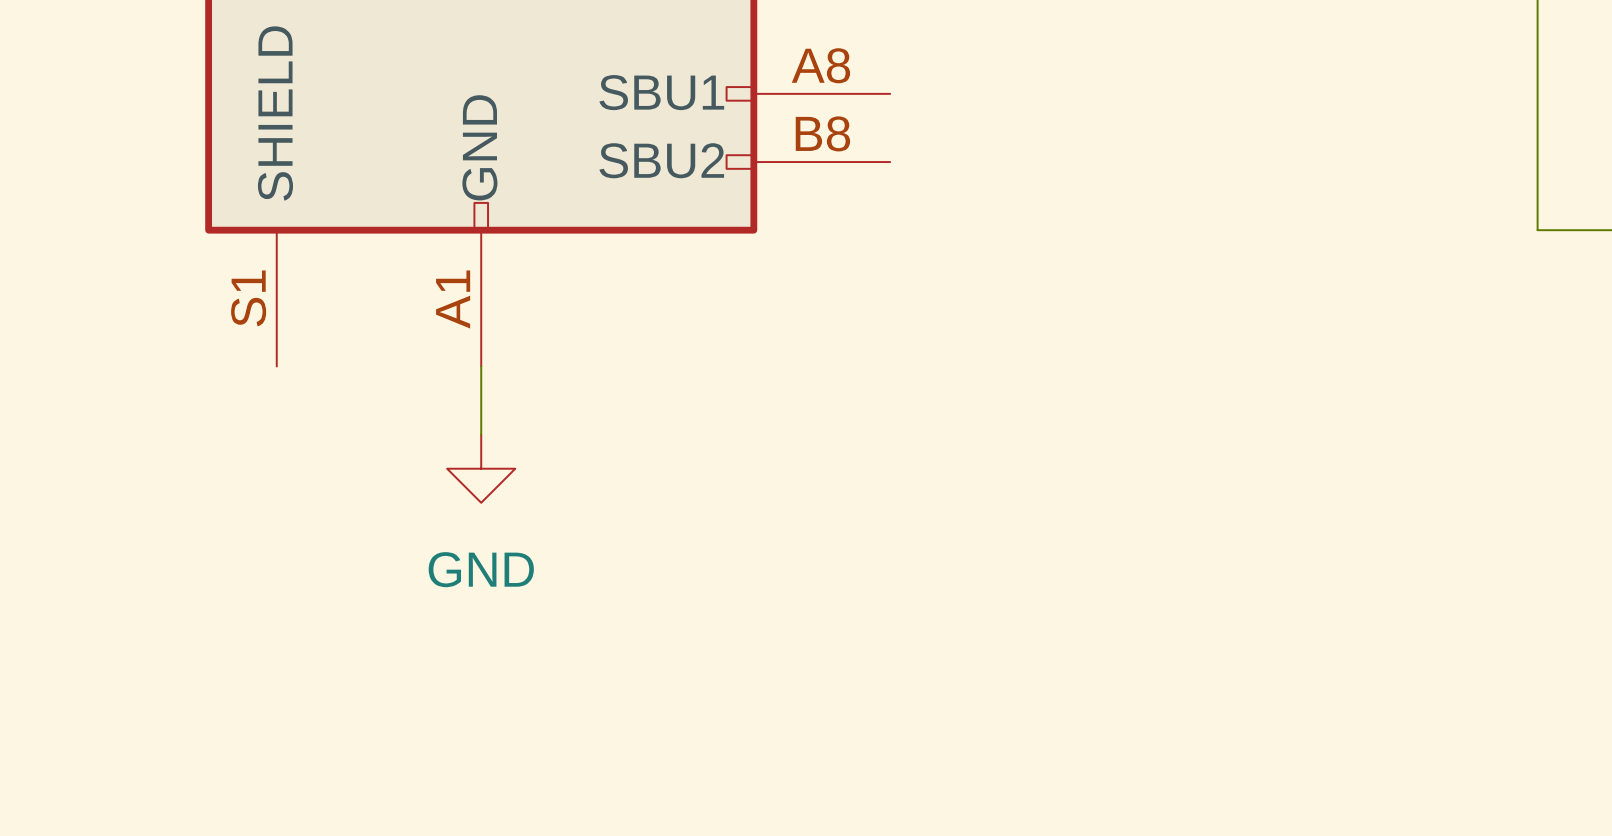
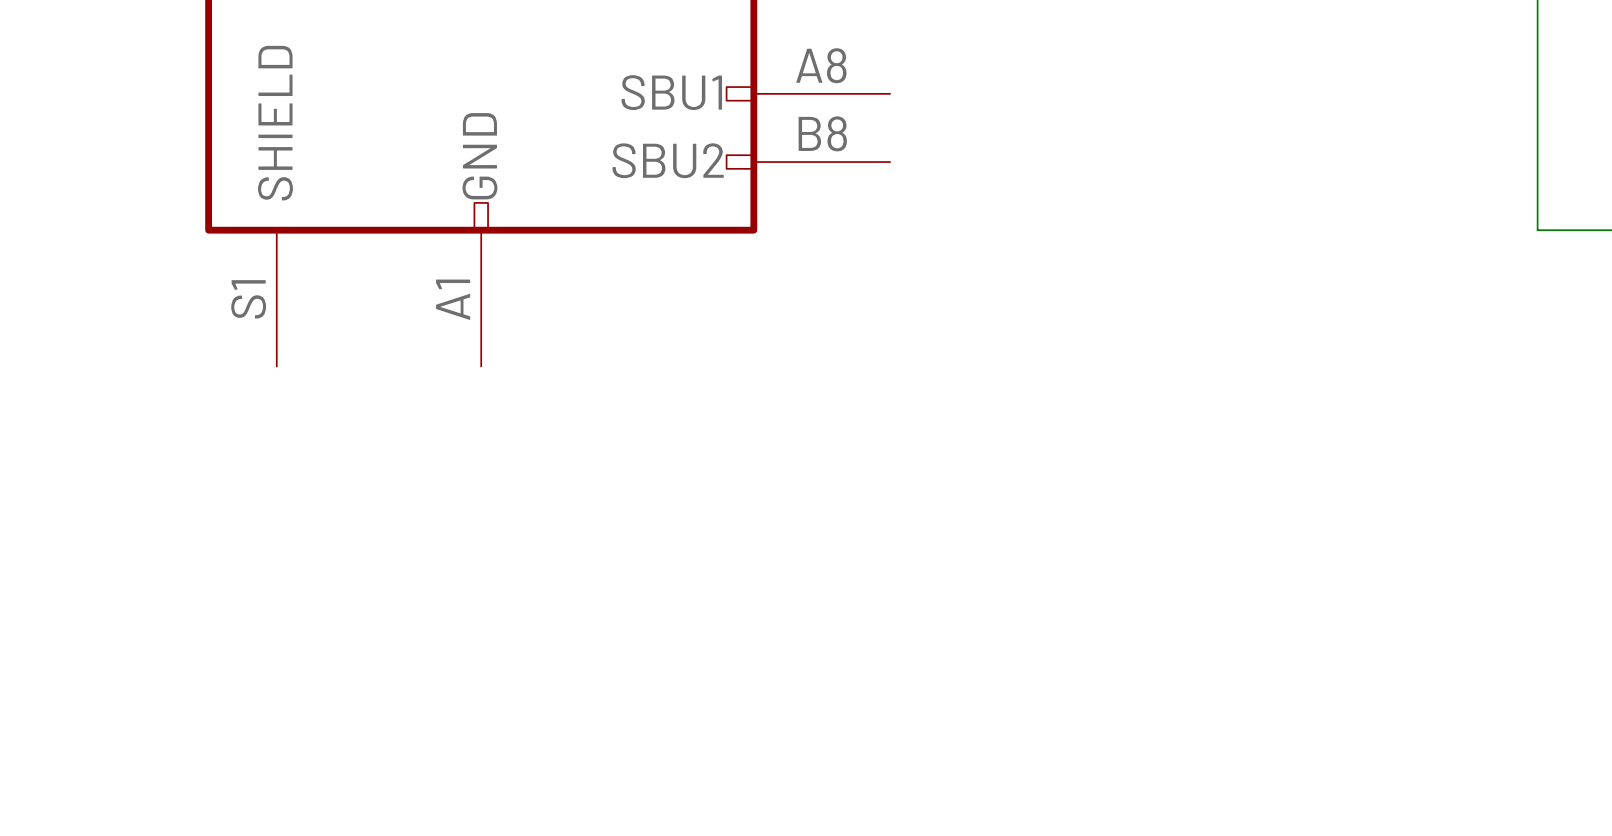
wire: (481, 366) (481, 434) -> none
power symbol: GND (481, 468) -> none

